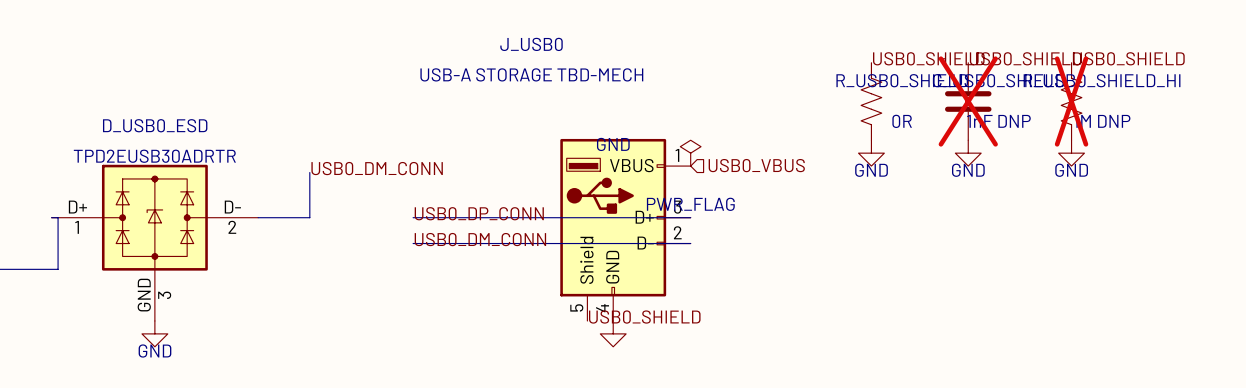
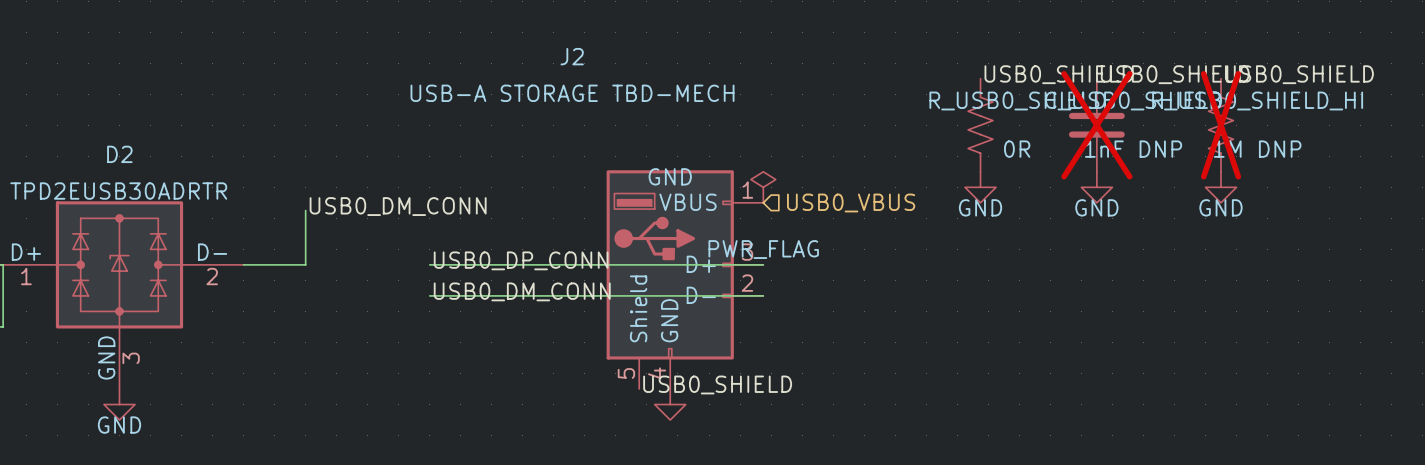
J_USB0 name: J_USB0 (531, 44) -> J2 (572, 56)
D_USB0_ESD name: D_USB0_ESD (155, 125) -> D2 (119, 154)

